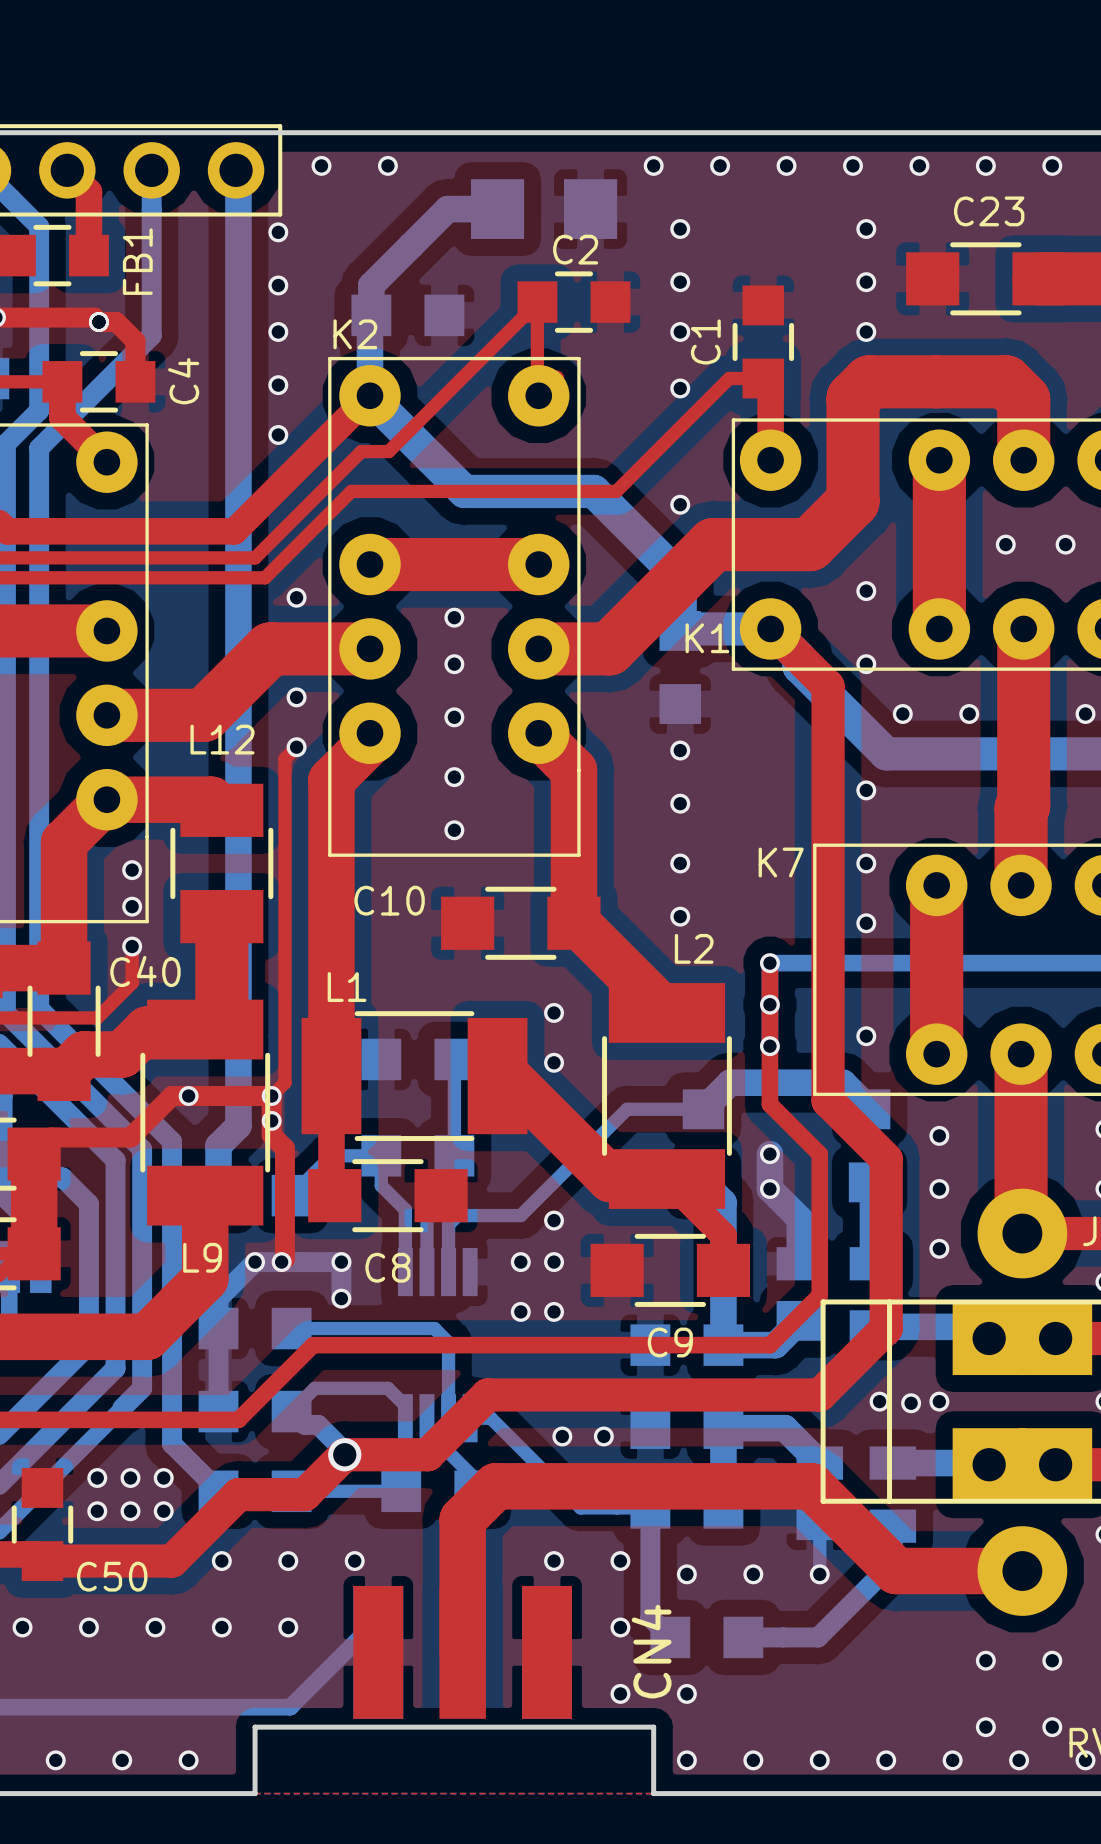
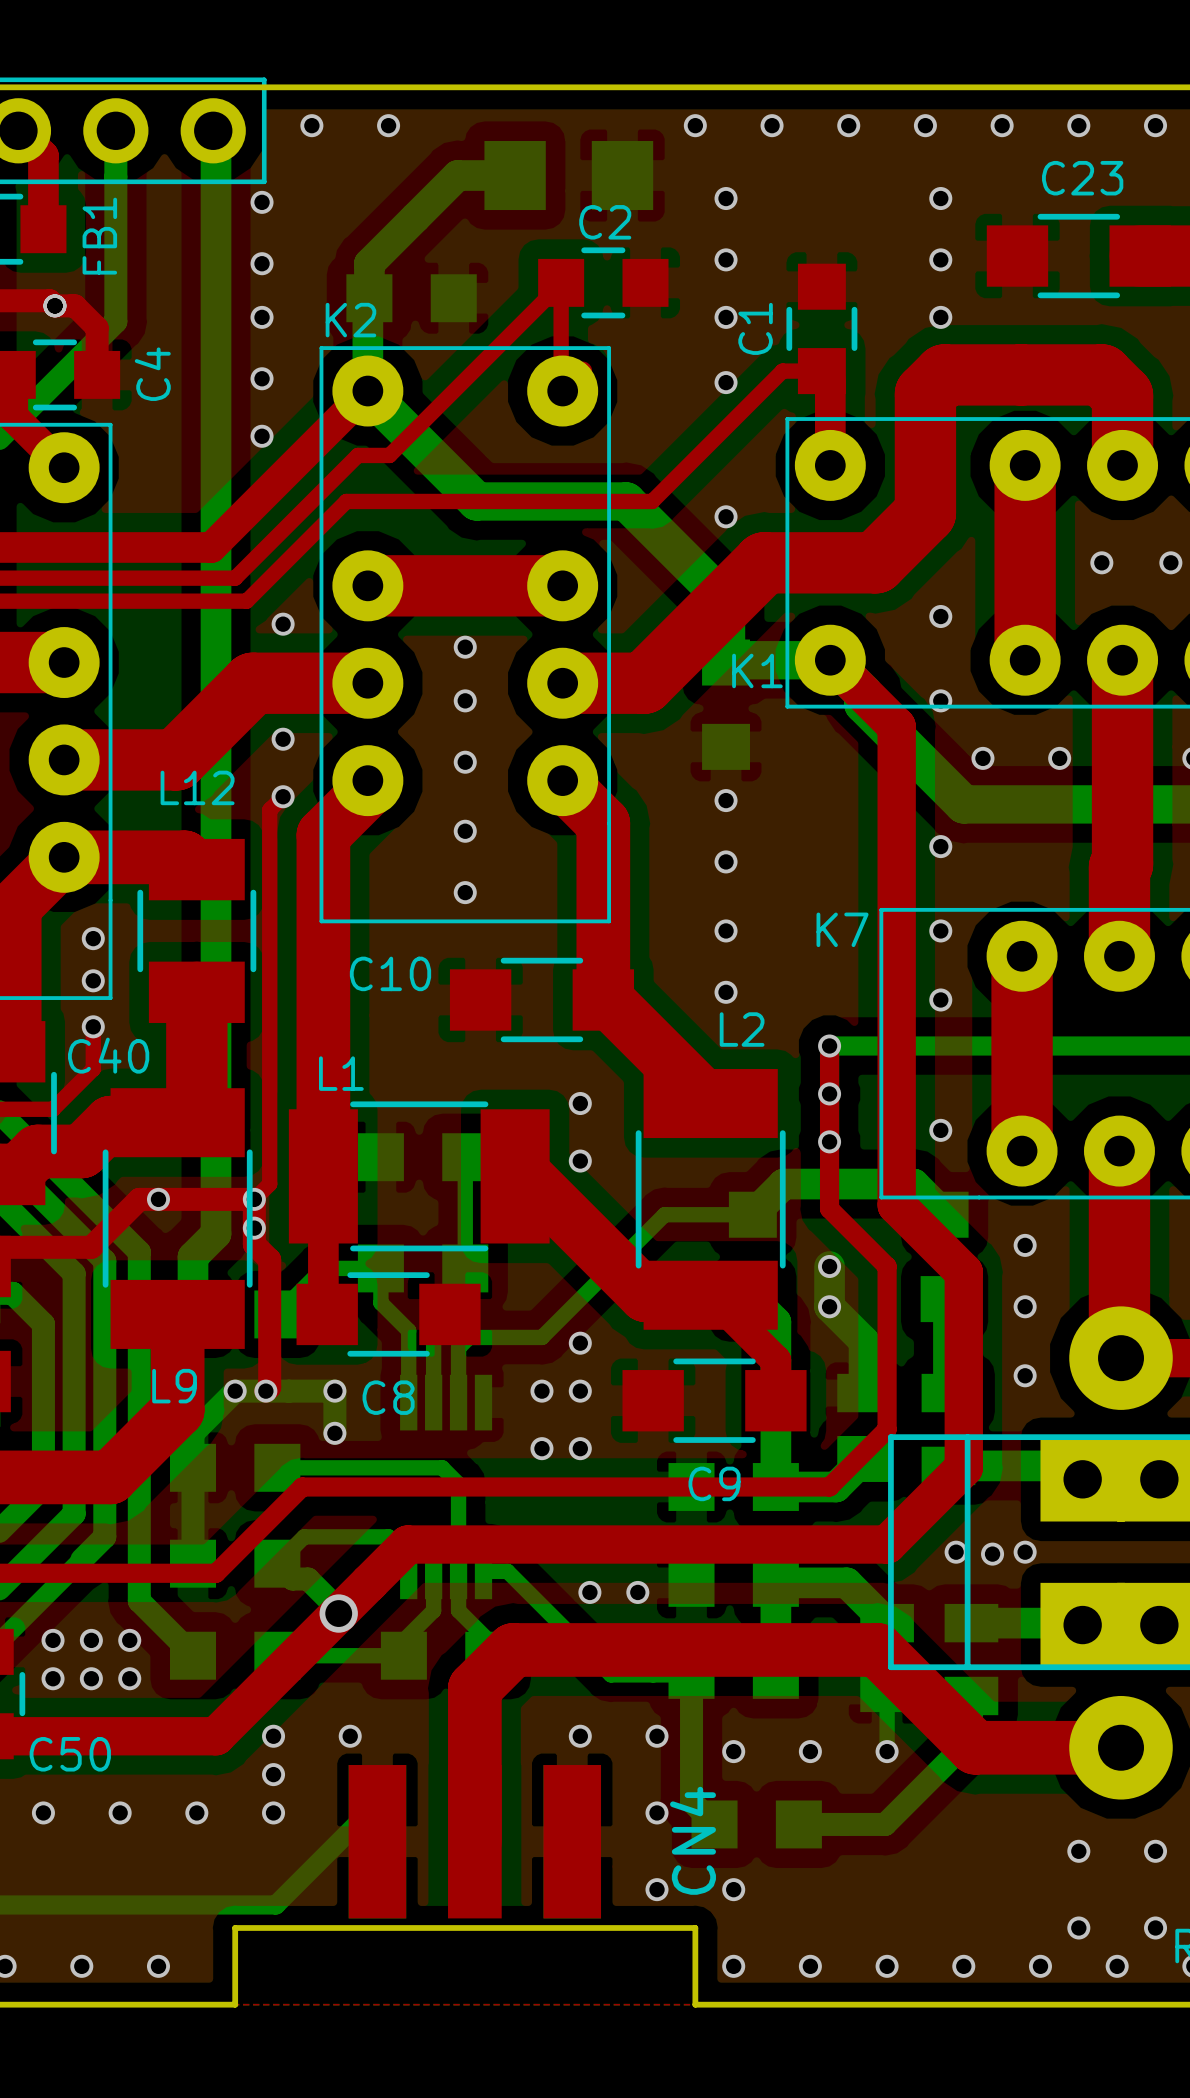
top track: (487, 1394) (427, 1454) (344, 1454) -> (503, 1544) (407, 1544) (338, 1613)
top track: (304, 1494) (238, 1494) (172, 1561) -> (292, 1659) (216, 1736) (139, 1736)
via position: (221, 1561) -> (273, 1774)

